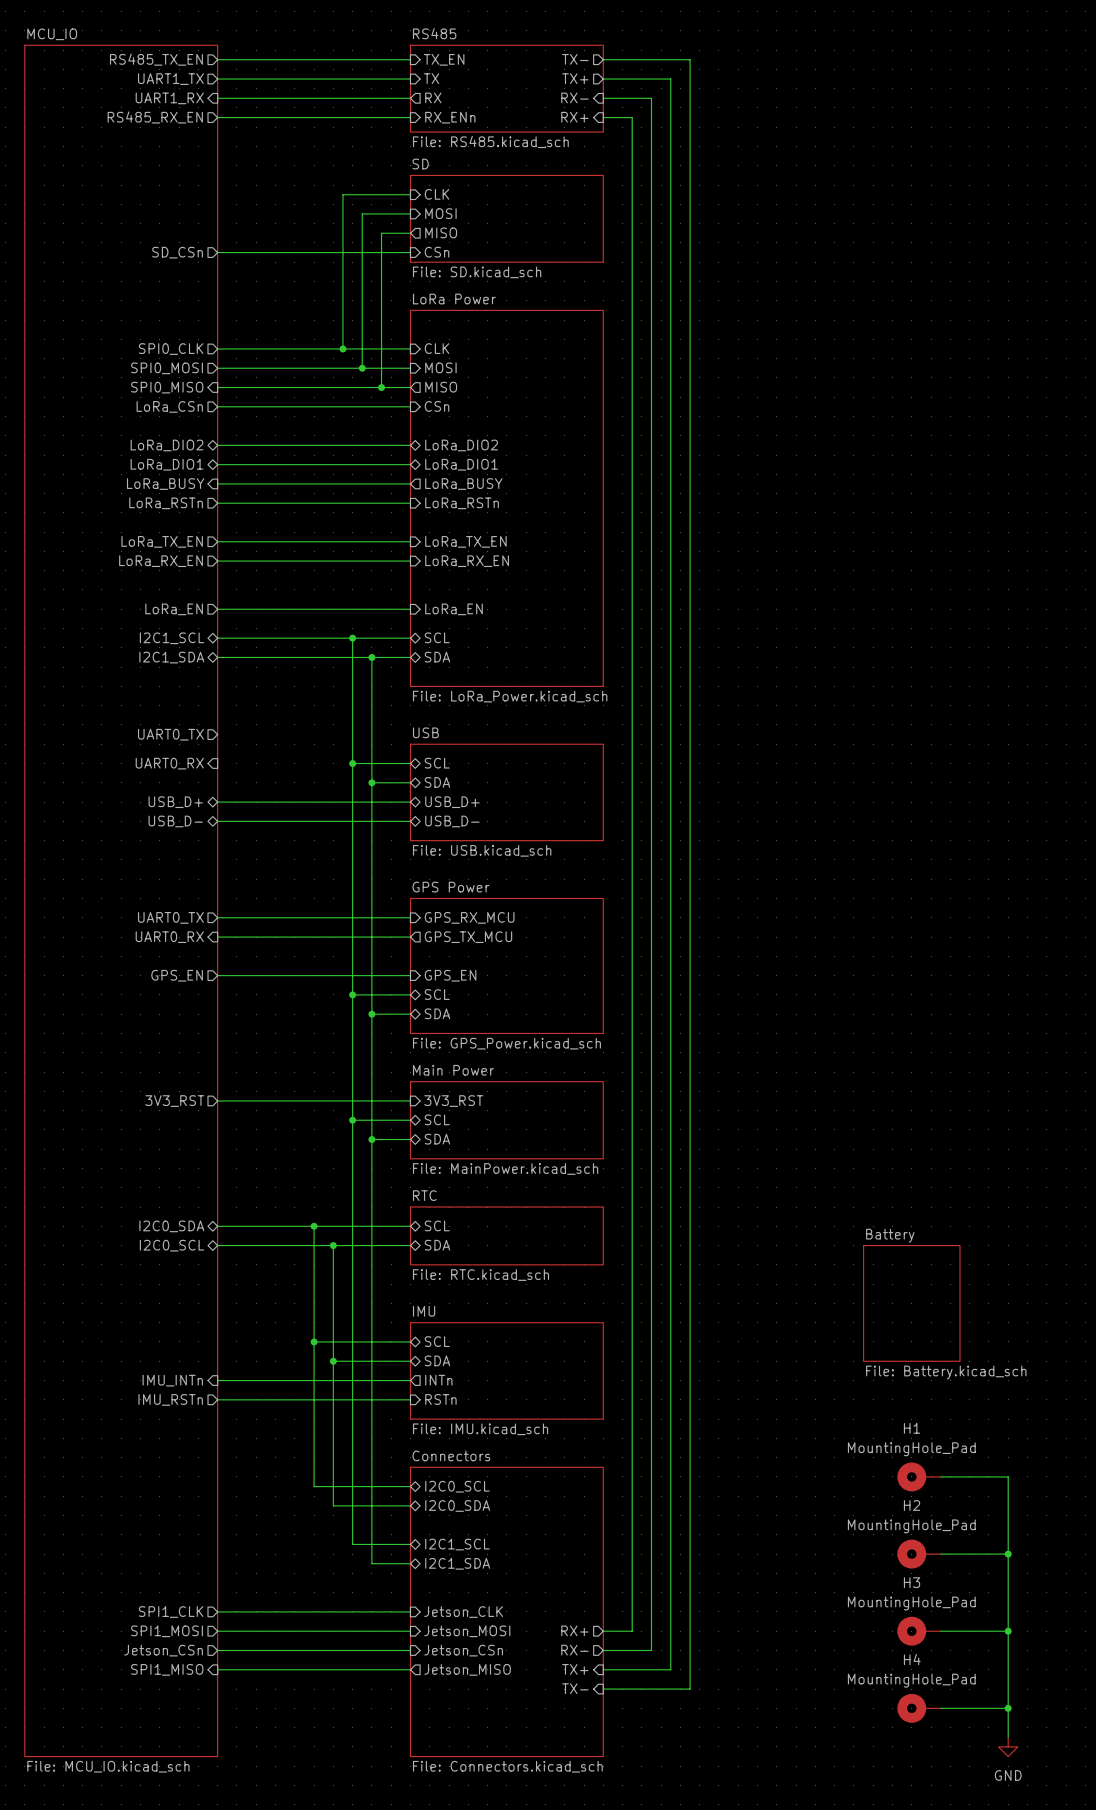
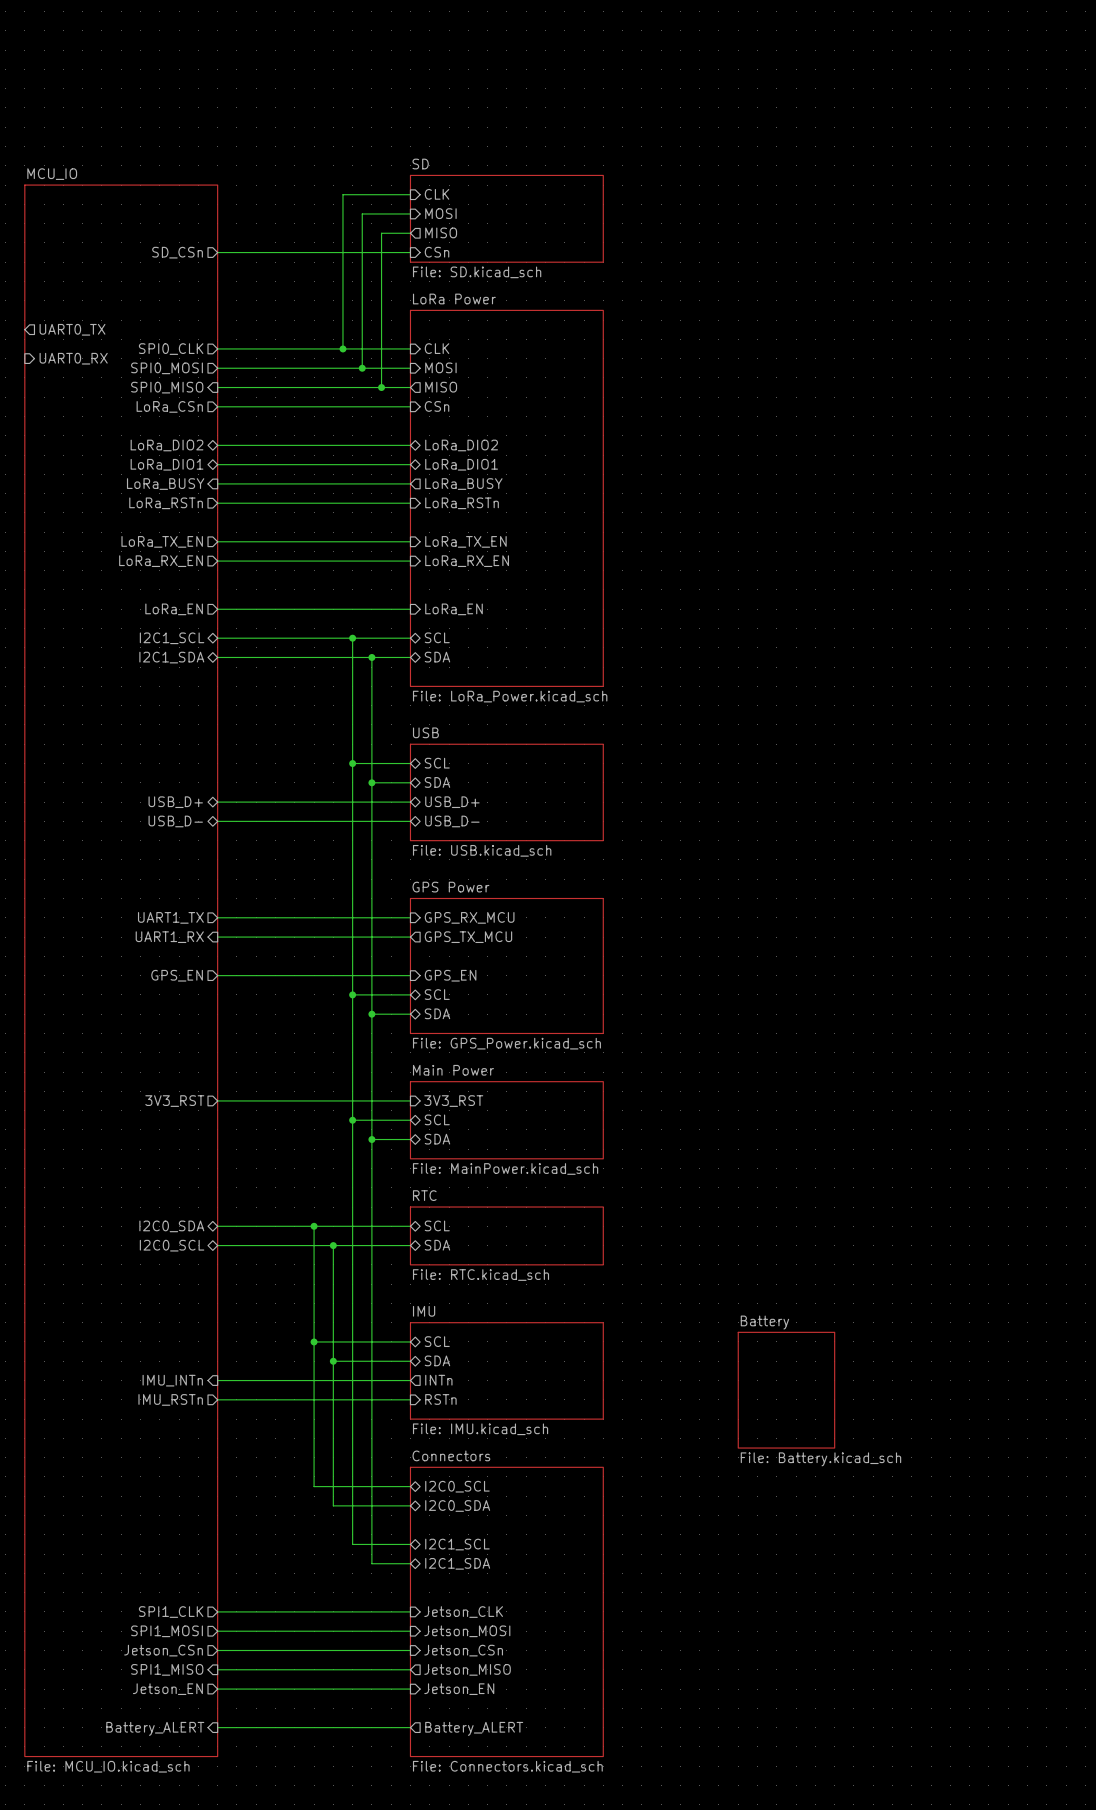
sheet pin: RS485_TX_EN (156, 59) -> none
wire: (217, 59) (410, 59) -> none
sheet pin: TX_EN (444, 59) -> none
sheet pin: TX- (575, 59) -> none
wire: (603, 59) (690, 59) (690, 1689) (603, 1689) -> none
sheet pin: TX (431, 78) -> none
sheet pin: TX+ (575, 78) -> none
sheet pin: UART1_TX (170, 79) -> none
wire: (217, 79) (410, 79) -> none
wire: (603, 79) (670, 79) (670, 1669) (603, 1669) -> none
sheet RS485: File: RS485.kicad_sch (506, 88) -> none
sheet pin: RX (433, 97) -> none
sheet pin: RX- (574, 97) -> none
sheet pin: UART1_RX (169, 98) -> none
wire: (217, 98) (410, 98) -> none
wire: (603, 98) (651, 98) (651, 1650) (603, 1650) -> none
sheet pin: RS485_RX_EN (155, 117) -> none
wire: (217, 117) (410, 117) -> none
sheet pin: RX_ENn (450, 117) -> none
sheet pin: RX+ (574, 117) -> none
wire: (603, 117) (632, 117) (632, 1631) (603, 1631) -> none
sheet pin: none -> UART0_TX (72, 329)
sheet pin: none -> UART0_RX (73, 358)
sheet pin: UART0_TX (170, 734) -> none
sheet pin: UART0_RX (169, 763) -> none
sheet MCU_IO: File: MCU_IO.kicad_sch (121, 900) -> none
sheet pin: UART0_TX (170, 917) -> UART1_TX (170, 917)
sheet pin: UART0_RX (169, 937) -> UART1_RX (169, 937)
sheet MCU_IO: none -> File: MCU_IO.kicad_sch (121, 970)
sheet Battery position: (911, 1303) -> (786, 1390)
H1: MountingHole_Pad (919, 1476) -> none
wire: (940, 1476) (1008, 1476) (1008, 1737) -> none
H2: MountingHole_Pad (919, 1554) -> none
wire: (940, 1554) (1008, 1554) -> none
junction: (1008, 1554) -> none
sheet pin: RX+ (574, 1630) -> none
H3: MountingHole_Pad (919, 1631) -> none
wire: (940, 1631) (1008, 1631) -> none
junction: (1008, 1631) -> none
sheet pin: RX- (574, 1650) -> none
sheet pin: TX+ (575, 1669) -> none
sheet pin: TX- (575, 1688) -> none
sheet pin: none -> Jetson_EN (167, 1689)
wire: none -> (217, 1689) (410, 1689)
sheet pin: none -> Jetson_EN (459, 1689)
H4: MountingHole_Pad (919, 1708) -> none
wire: (940, 1708) (1008, 1708) -> none
junction: (1008, 1708) -> none
wire: none -> (217, 1727) (410, 1727)
sheet pin: none -> Battery_ALERT (155, 1728)
sheet pin: none -> Battery_ALERT (474, 1728)
power symbol: GND (1008, 1746) -> none

